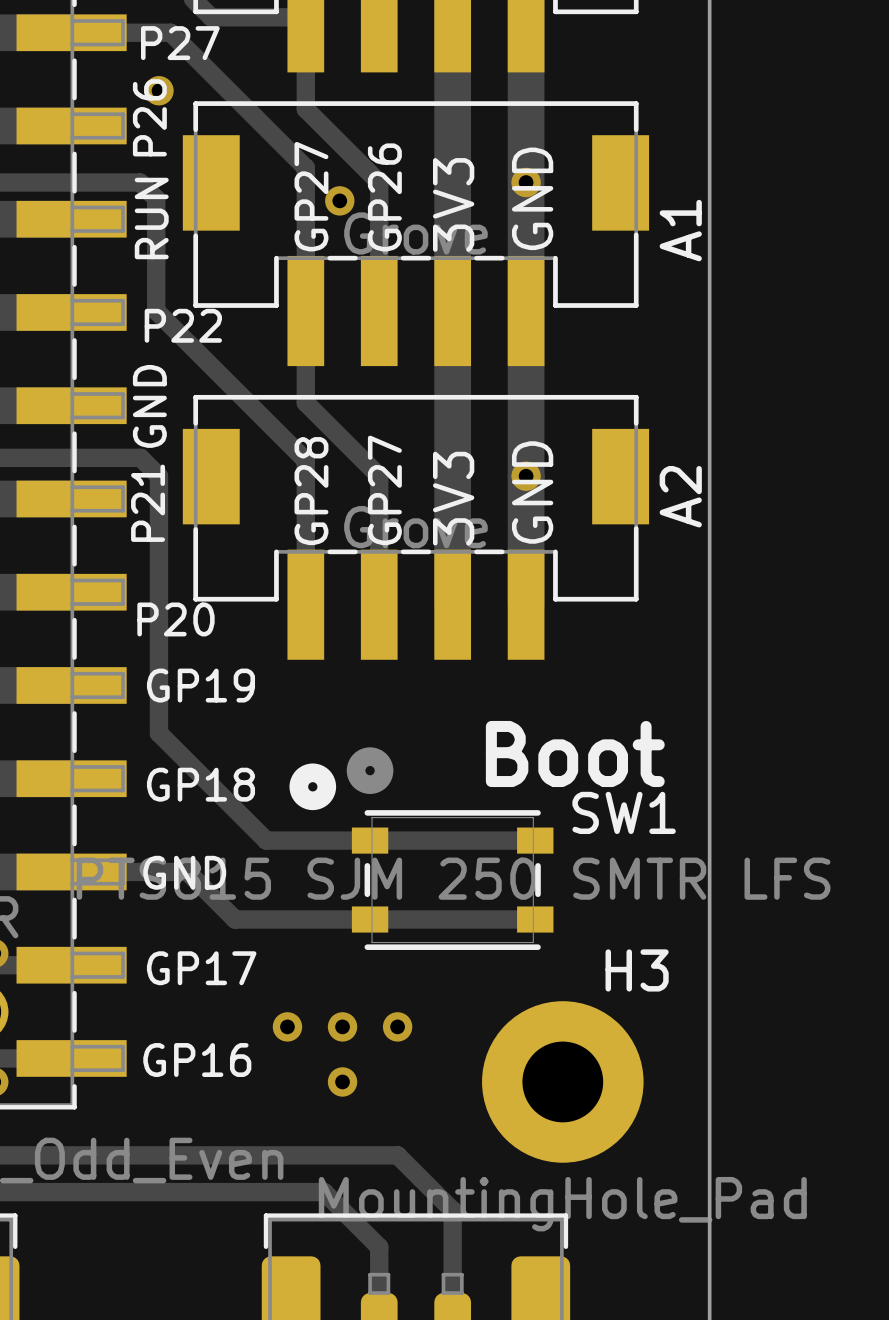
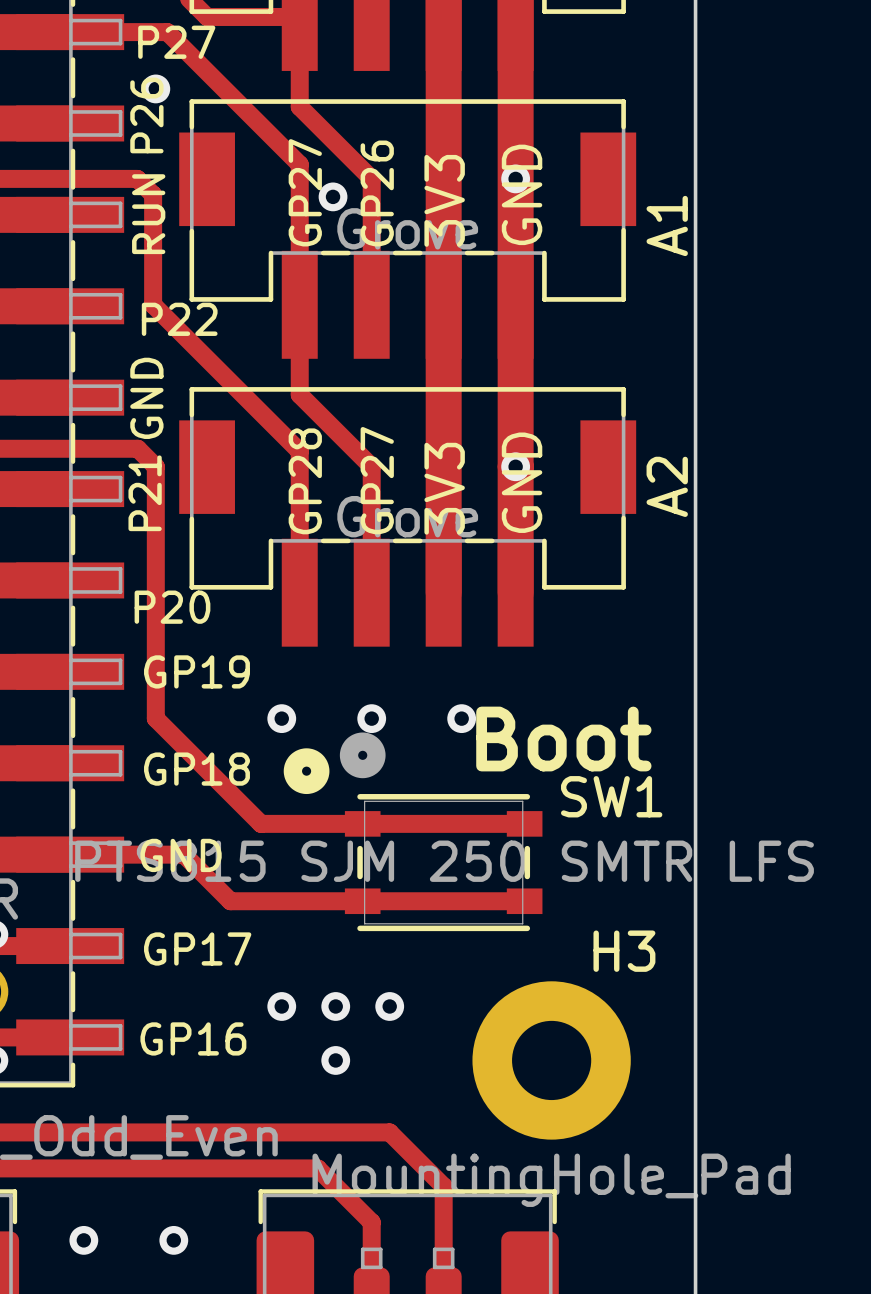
via: none -> (281, 718)
via: none -> (371, 718)
via: none -> (461, 718)
via: none -> (83, 1240)
via: none -> (173, 1240)

